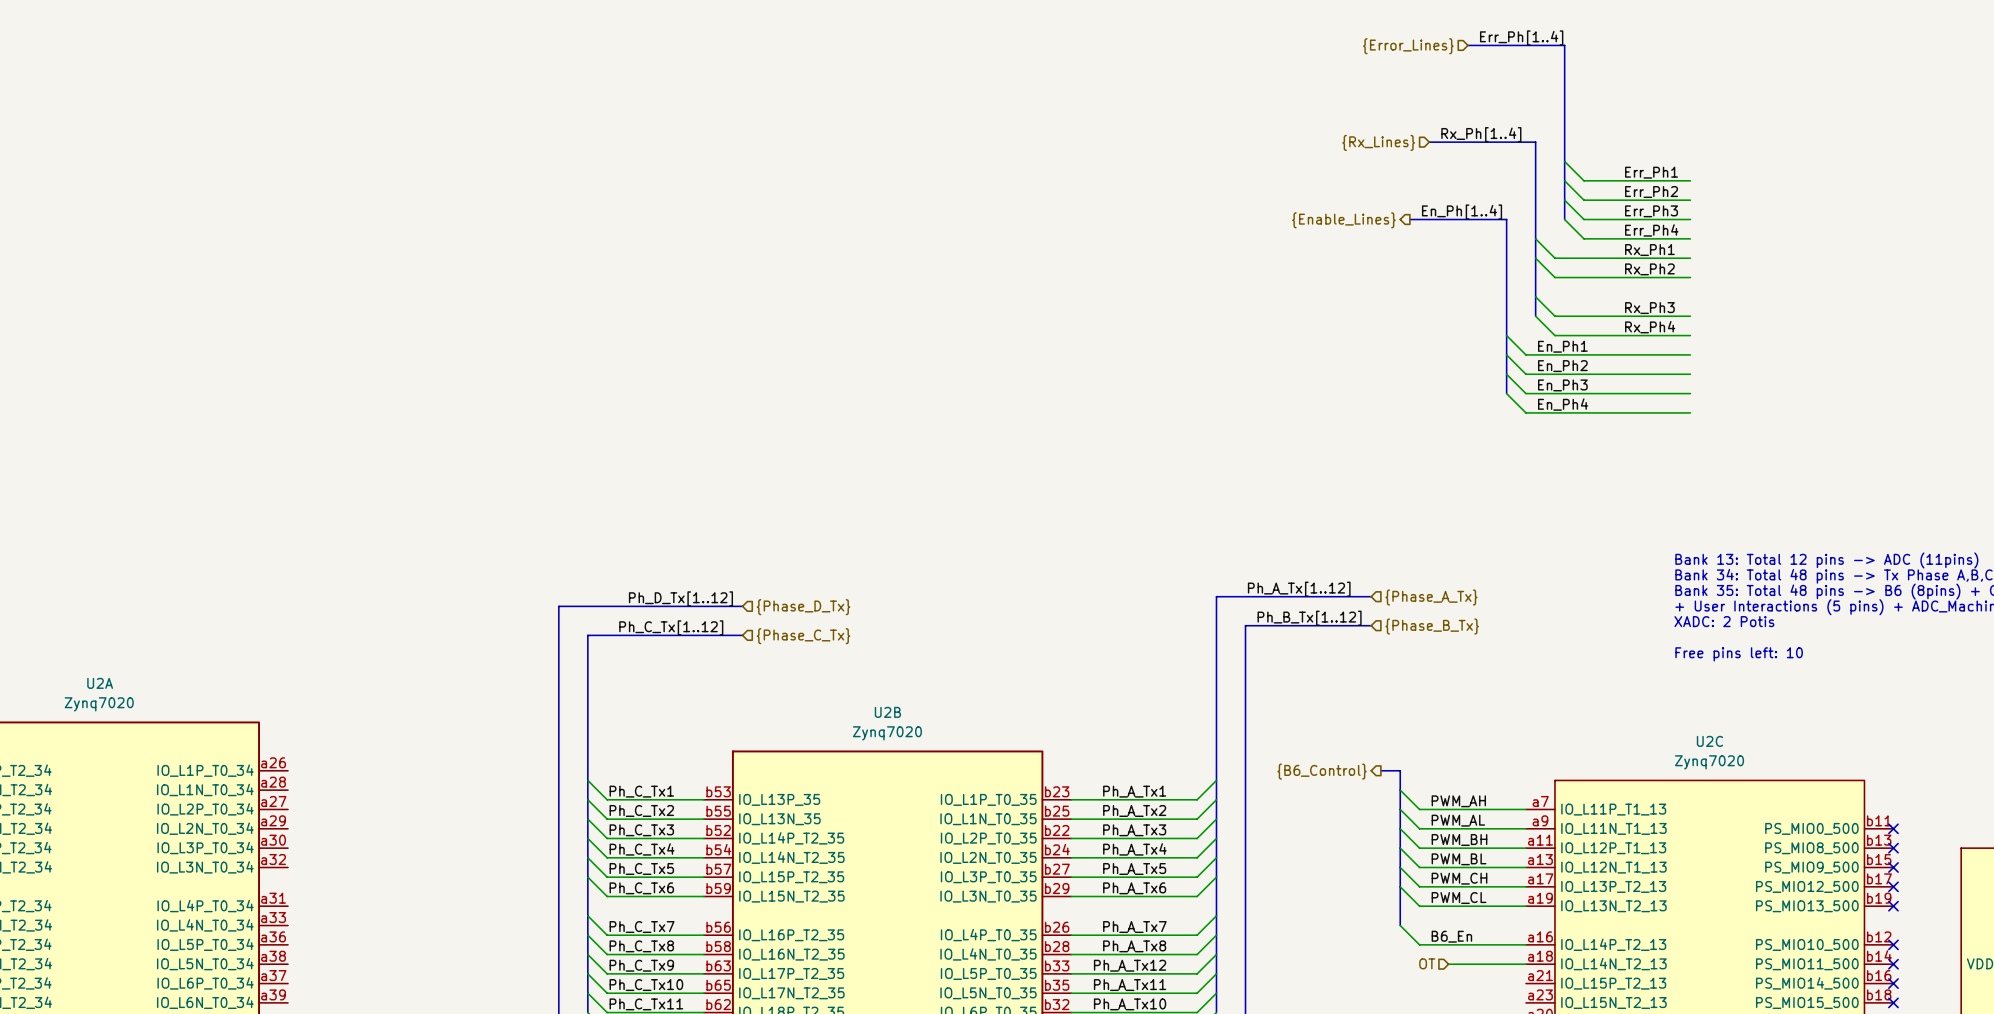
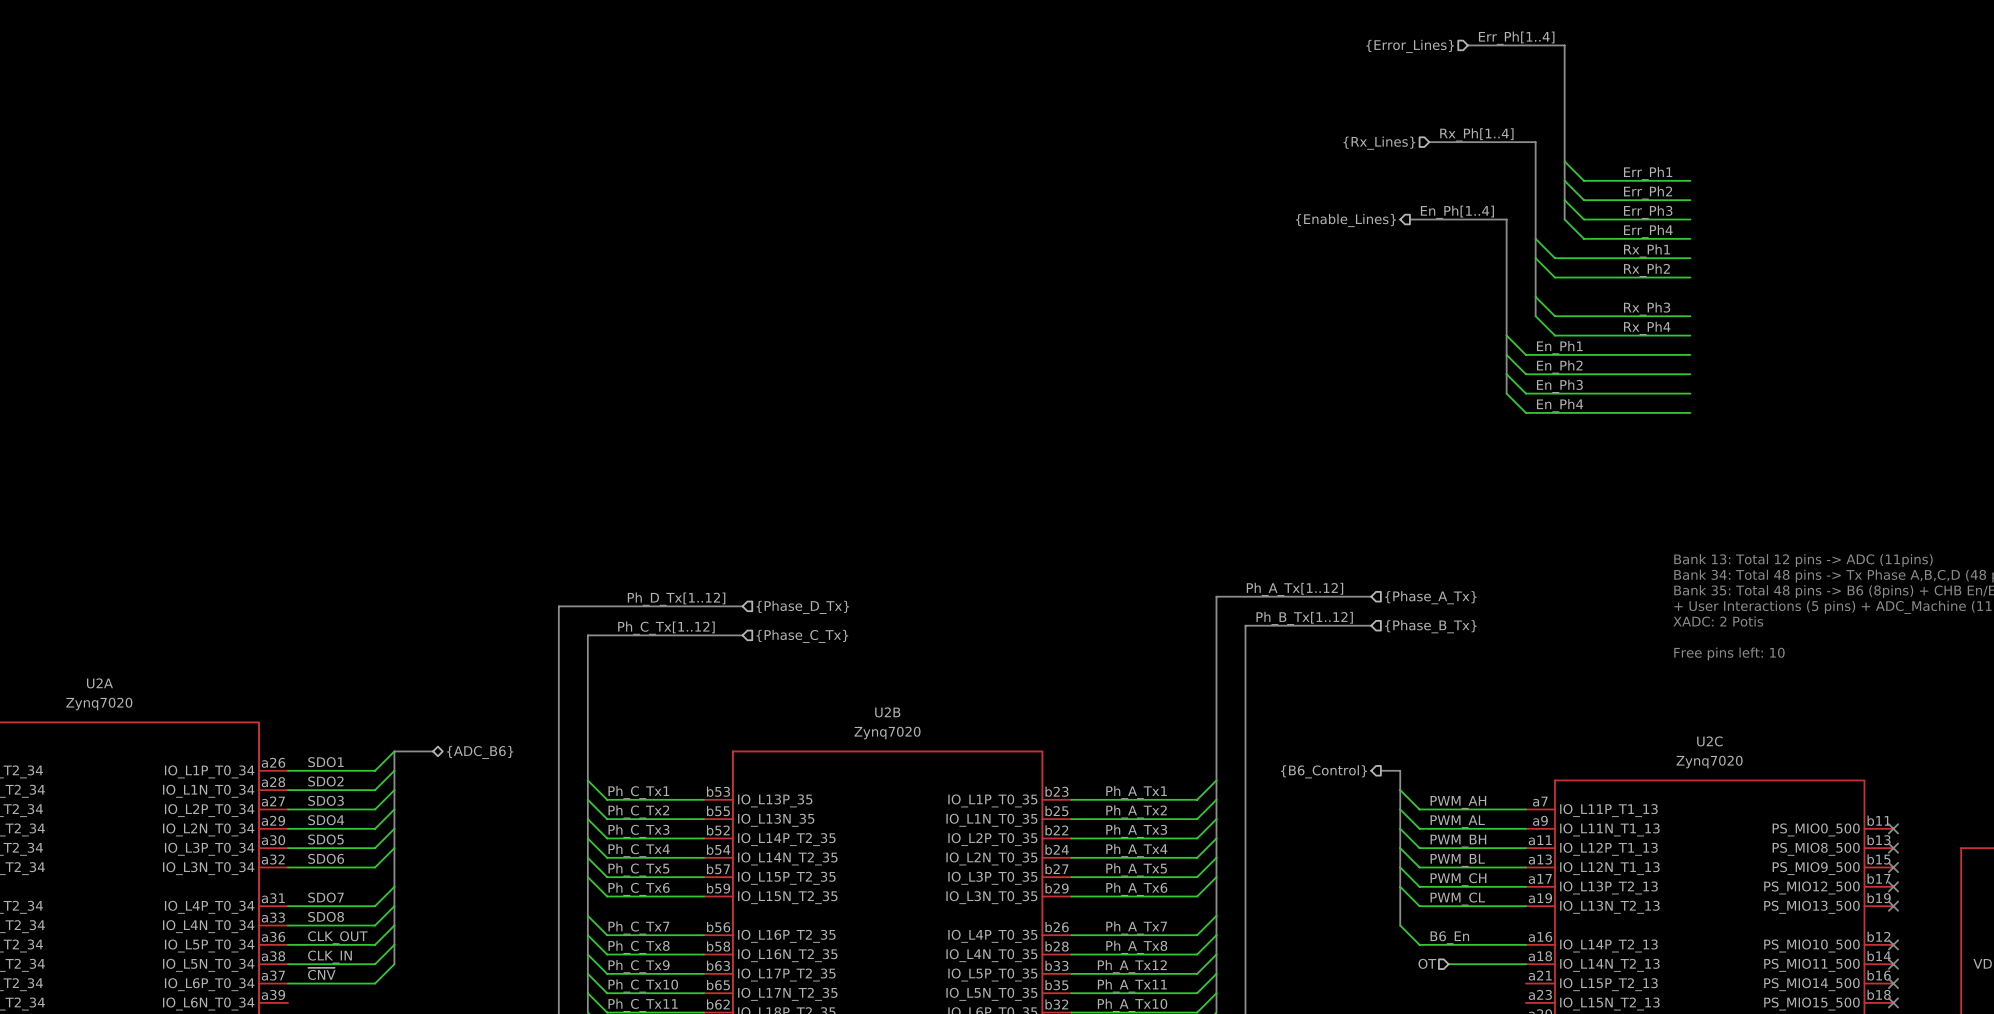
wire: none -> (394, 751) (375, 770) (288, 770)
bus: none -> (433, 751) (394, 751) (394, 964)
hierarchical label: none -> {ADC_B6} (480, 752)
label: none -> SDO1 (325, 762)
wire: none -> (394, 770) (375, 790) (288, 790)
label: none -> SDO2 (325, 781)
wire: none -> (394, 790) (375, 809) (288, 809)
label: none -> SDO3 (326, 800)
wire: none -> (394, 809) (375, 828) (288, 828)
label: none -> SDO4 (326, 820)
wire: none -> (394, 828) (375, 848) (288, 848)
label: none -> SDO5 (325, 839)
wire: none -> (394, 848) (375, 867) (288, 867)
label: none -> SDO6 (326, 858)
wire: none -> (394, 886) (375, 906) (288, 906)
label: none -> SDO7 (326, 897)
wire: none -> (394, 906) (375, 925) (288, 925)
label: none -> SDO8 (326, 916)
wire: none -> (394, 925) (375, 944) (288, 944)
label: none -> CLK_OUT (337, 937)
wire: none -> (394, 944) (375, 964) (288, 964)
label: none -> CLK_IN (330, 957)
wire: none -> (394, 964) (375, 983) (288, 983)
label: none -> ~{CNV} (321, 973)

